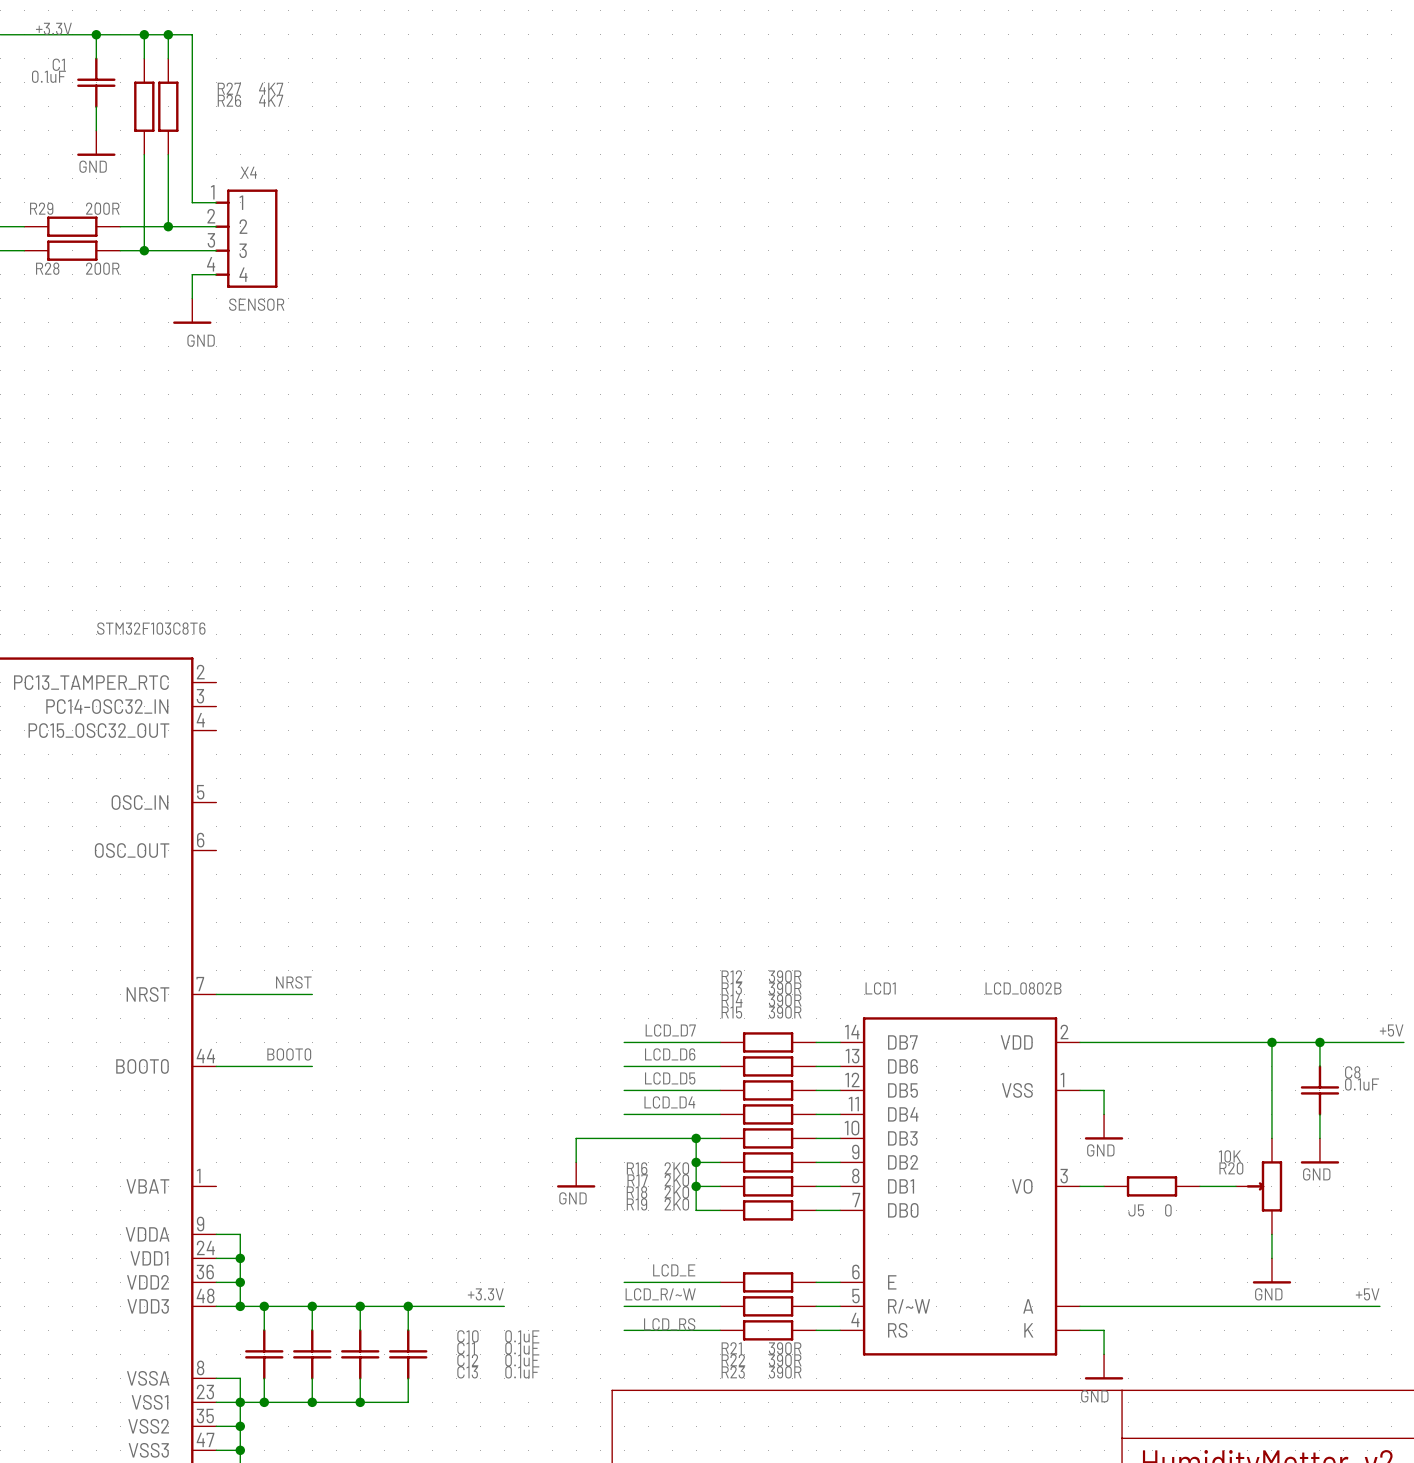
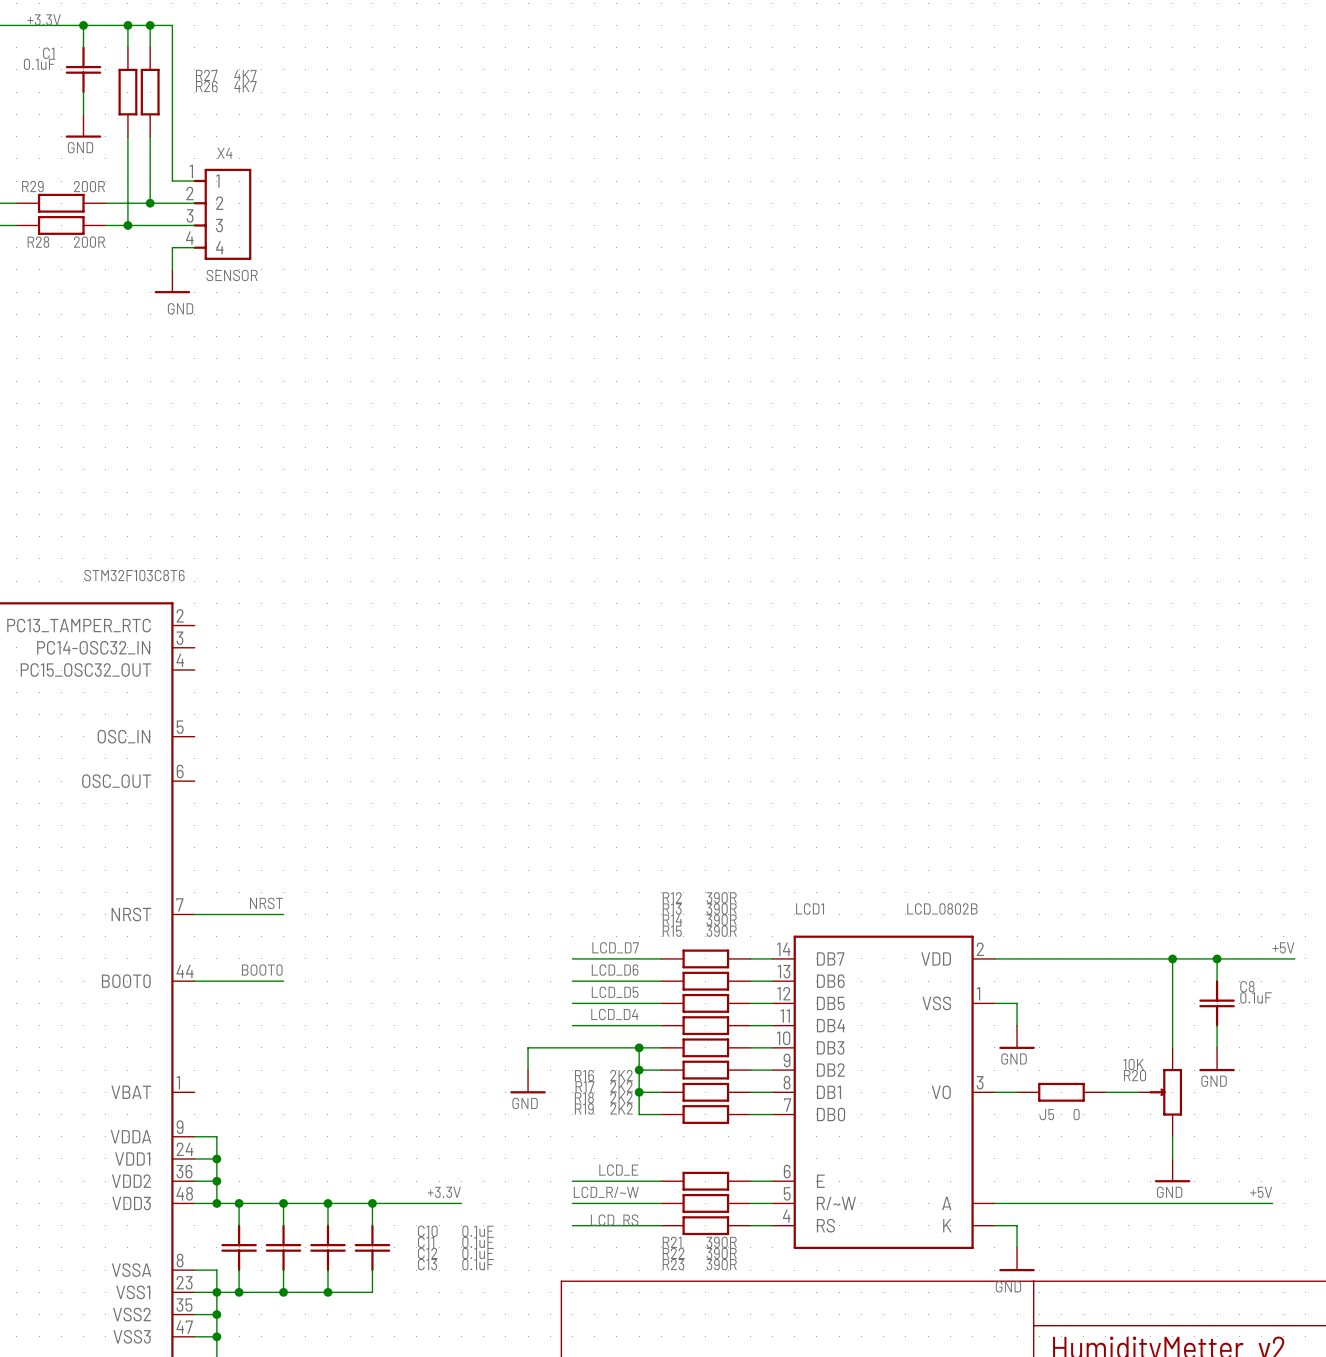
R16 value: 2K0 (676, 1168) -> 2K2 (621, 1075)
R17 value: 2K0 (676, 1180) -> 2K2 (621, 1086)
R18 value: 2K0 (676, 1192) -> 2K2 (621, 1097)
R19 value: 2K0 (676, 1204) -> 2K2 (621, 1108)

